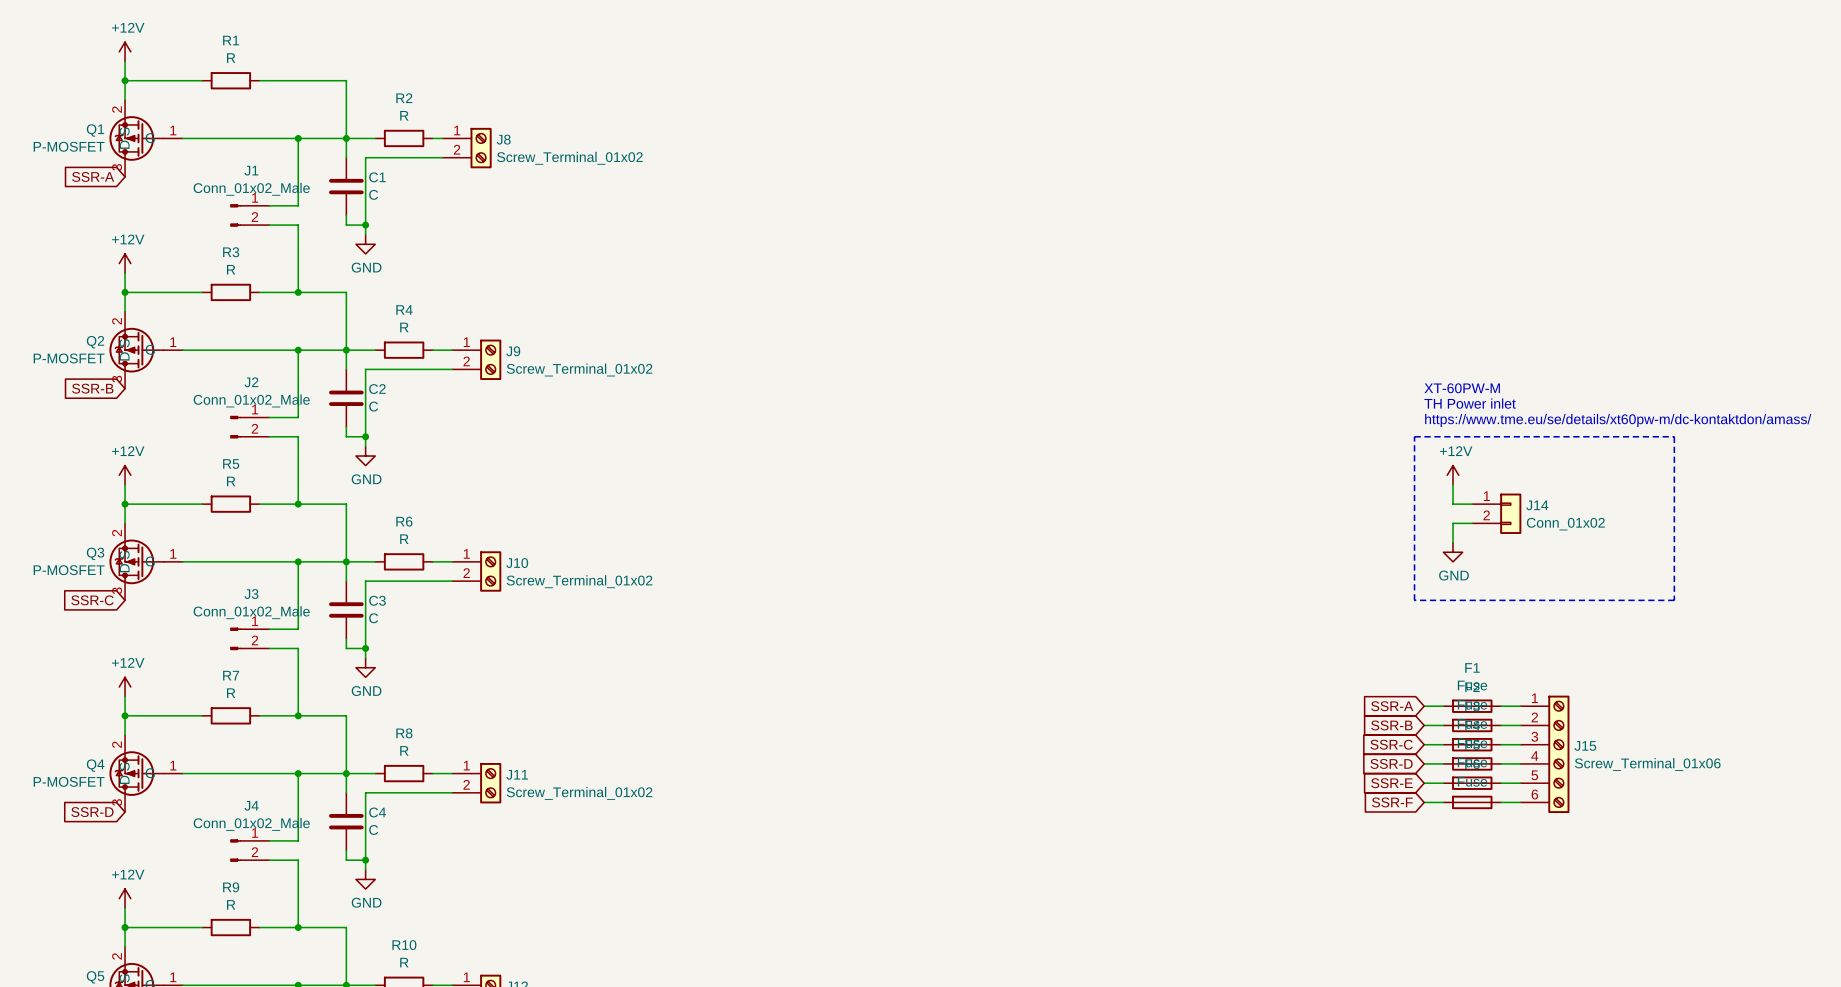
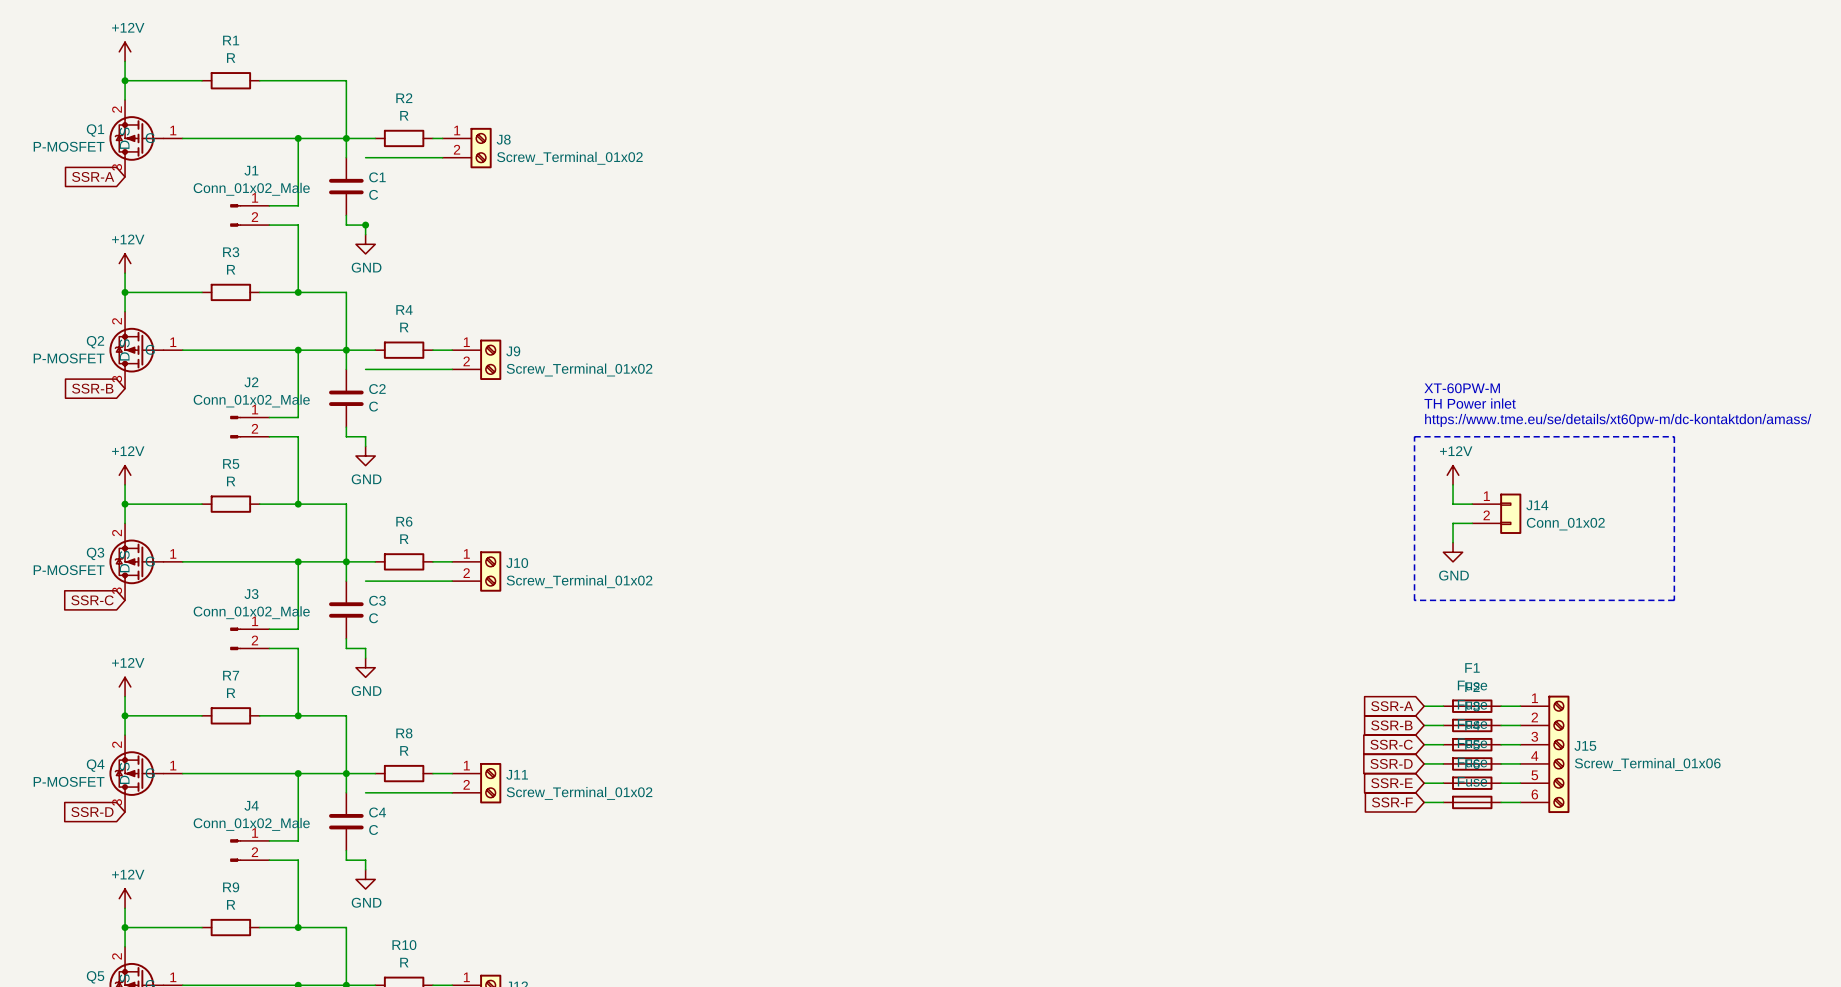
wire: (365, 157) (365, 225) -> none
wire: (365, 369) (365, 436) -> none
junction: (365, 436) -> none
wire: (365, 581) (365, 648) -> none
junction: (365, 648) -> none
wire: (365, 792) (365, 860) -> none
junction: (365, 860) -> none

